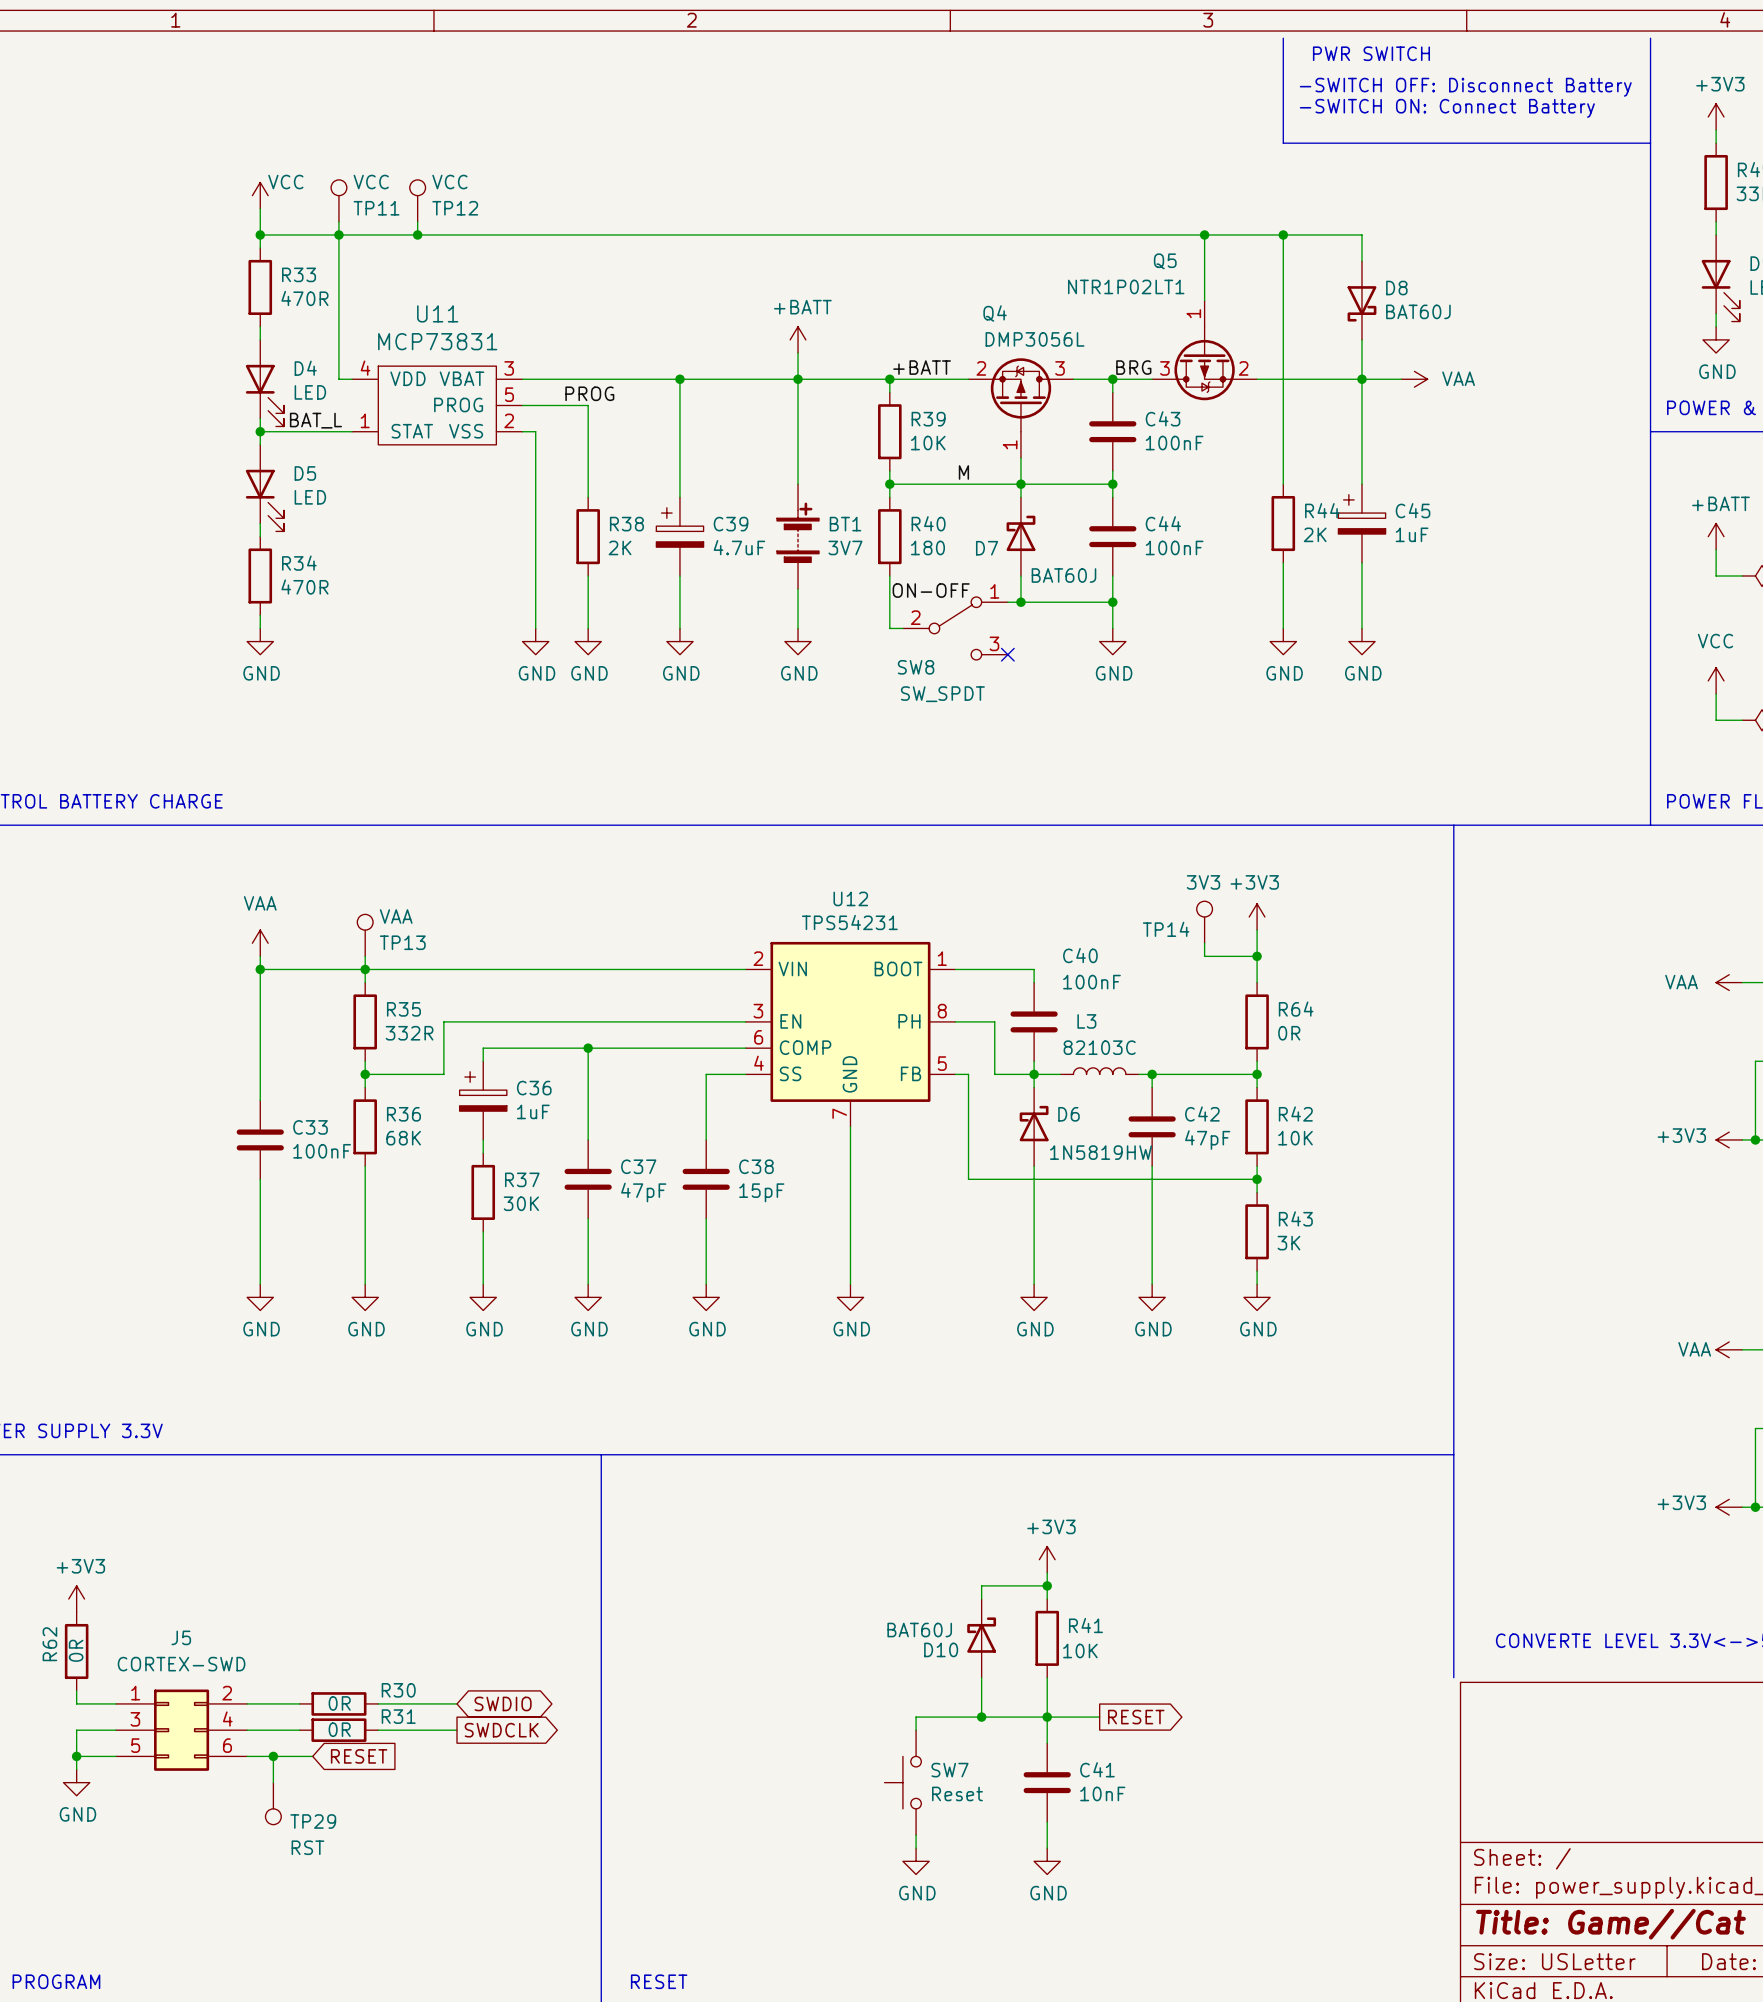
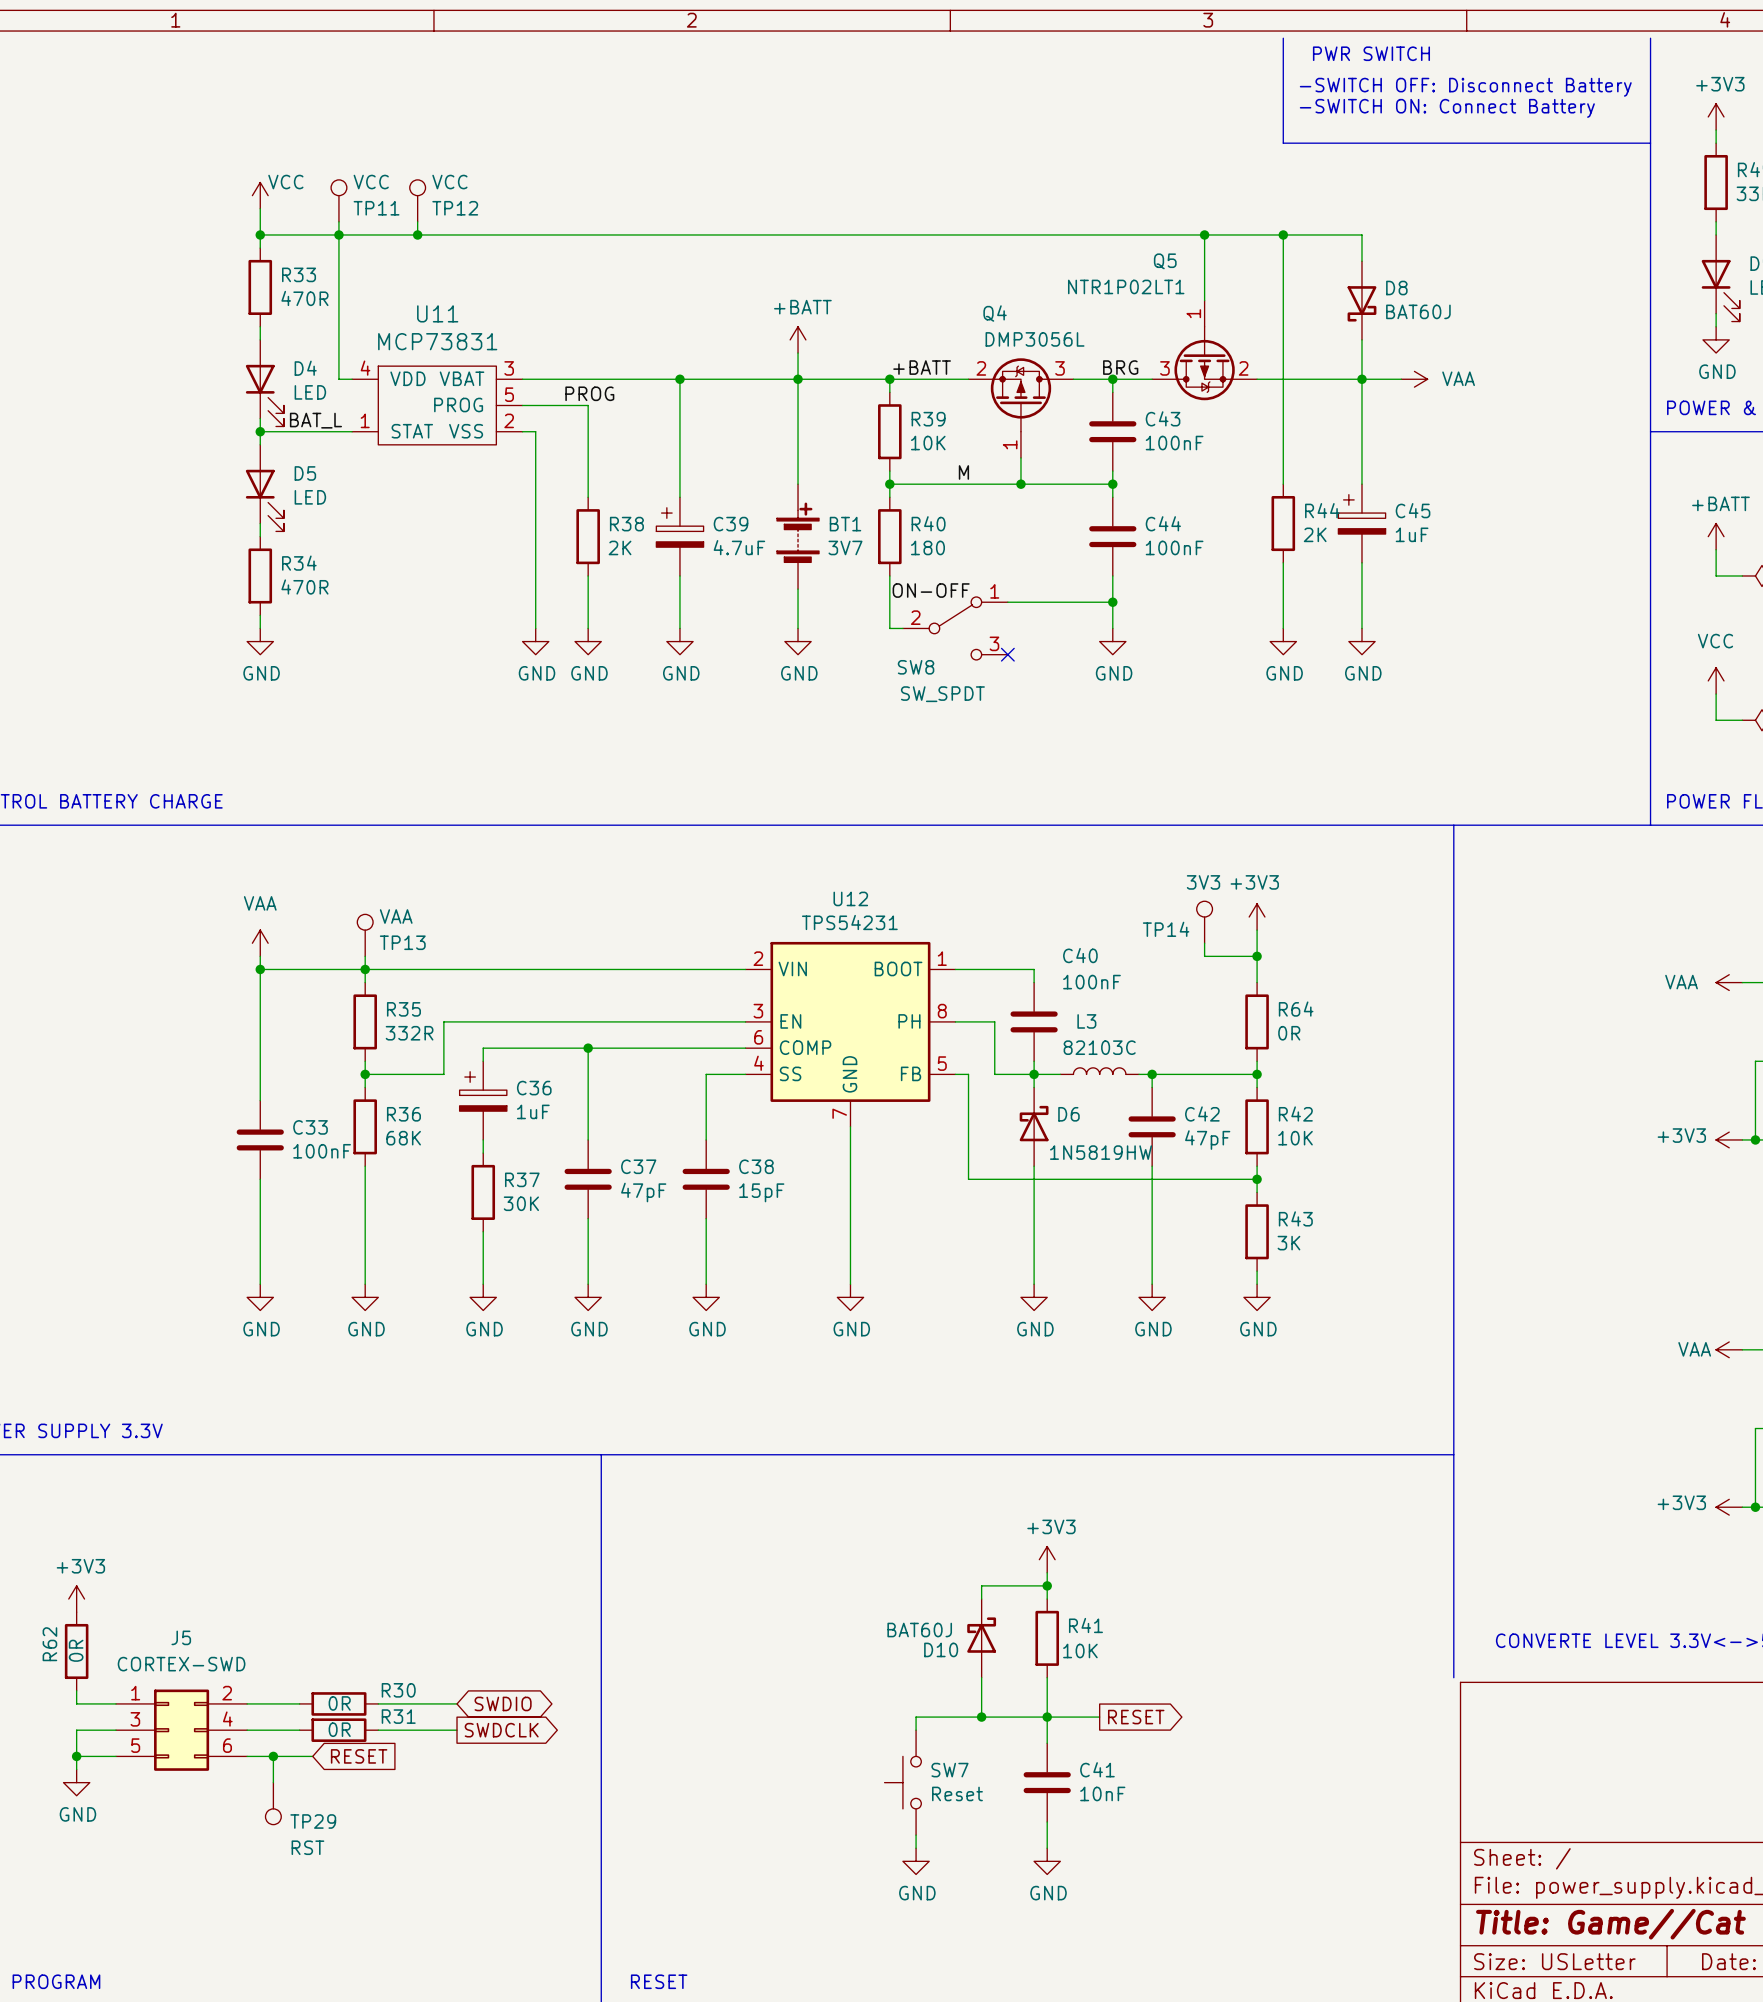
label position: BRG (1133, 367) -> BRG (1120, 367)
wire: (1020, 484) (1020, 497) -> none
D7: BAT60J (1020, 536) -> none
wire: (1020, 575) (1020, 602) -> none
junction: (1020, 602) -> none

